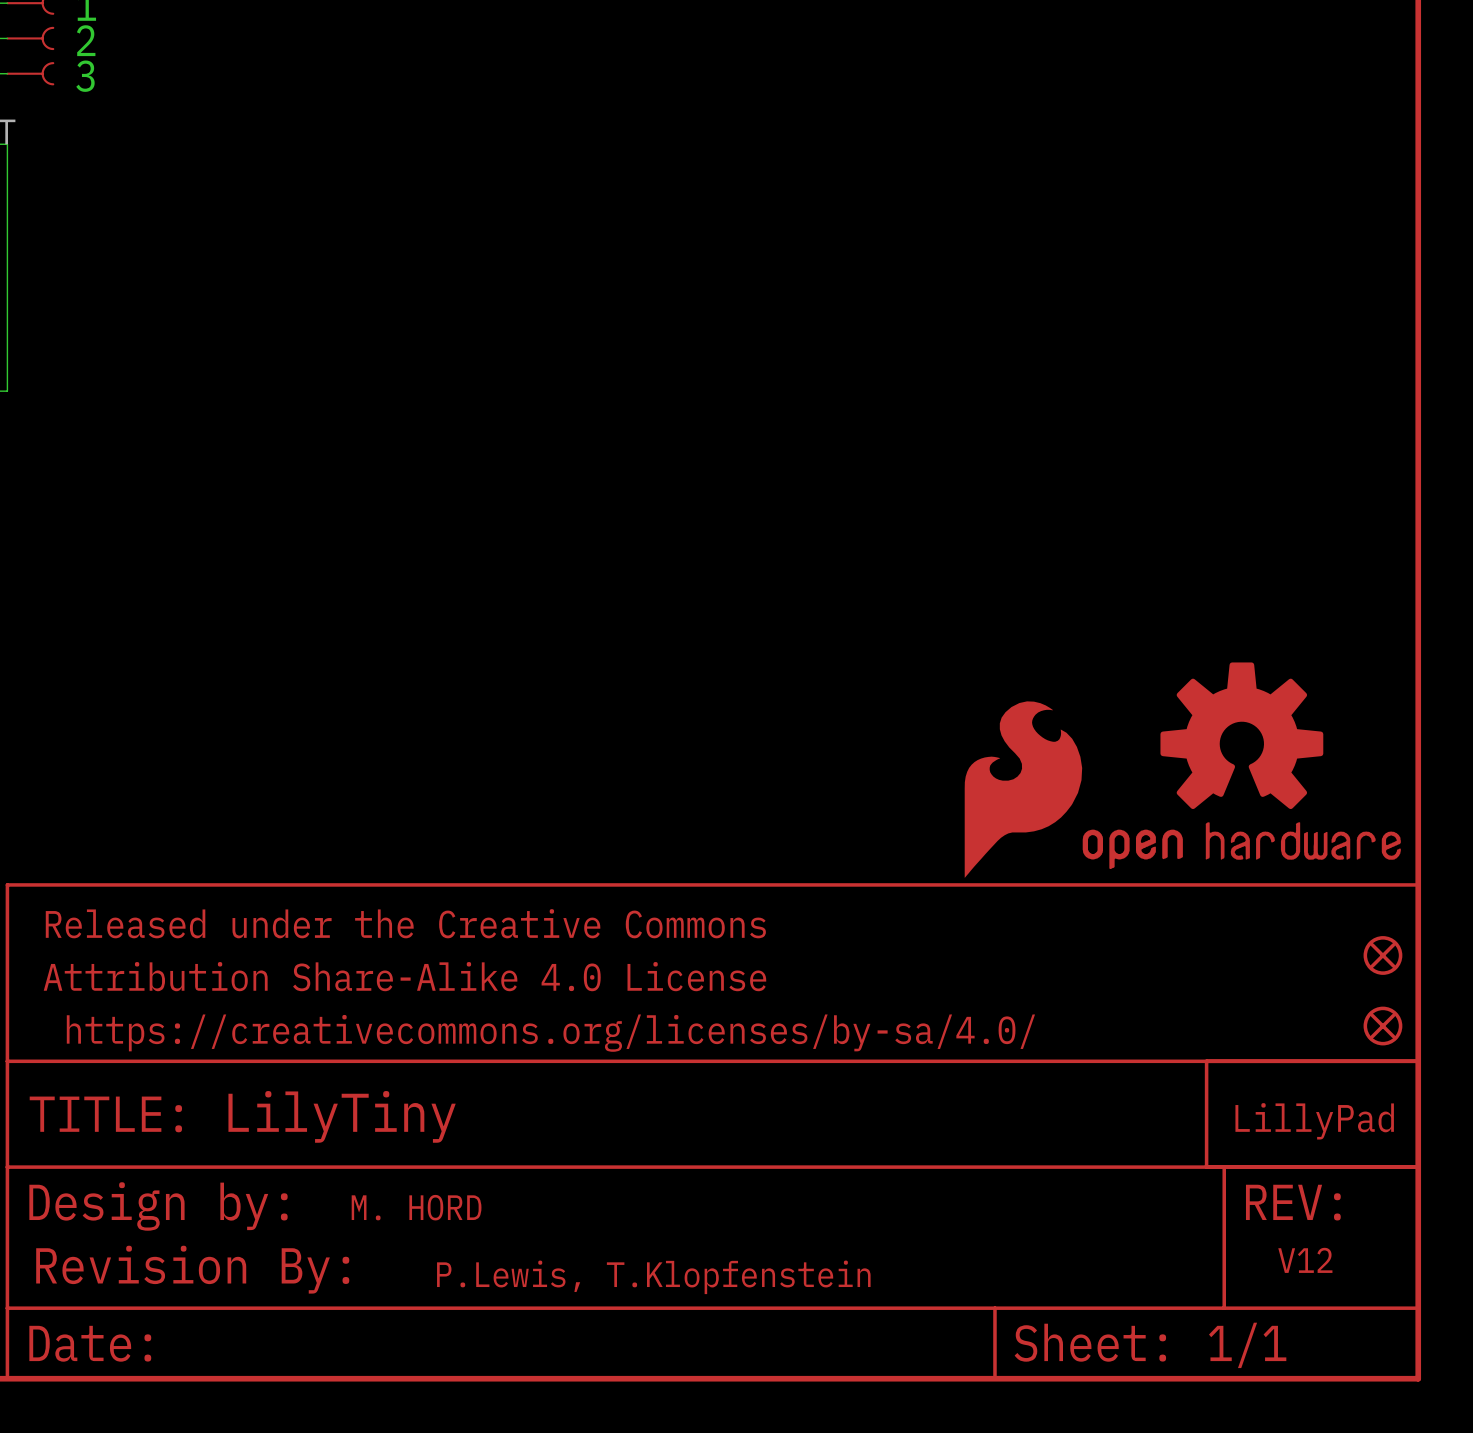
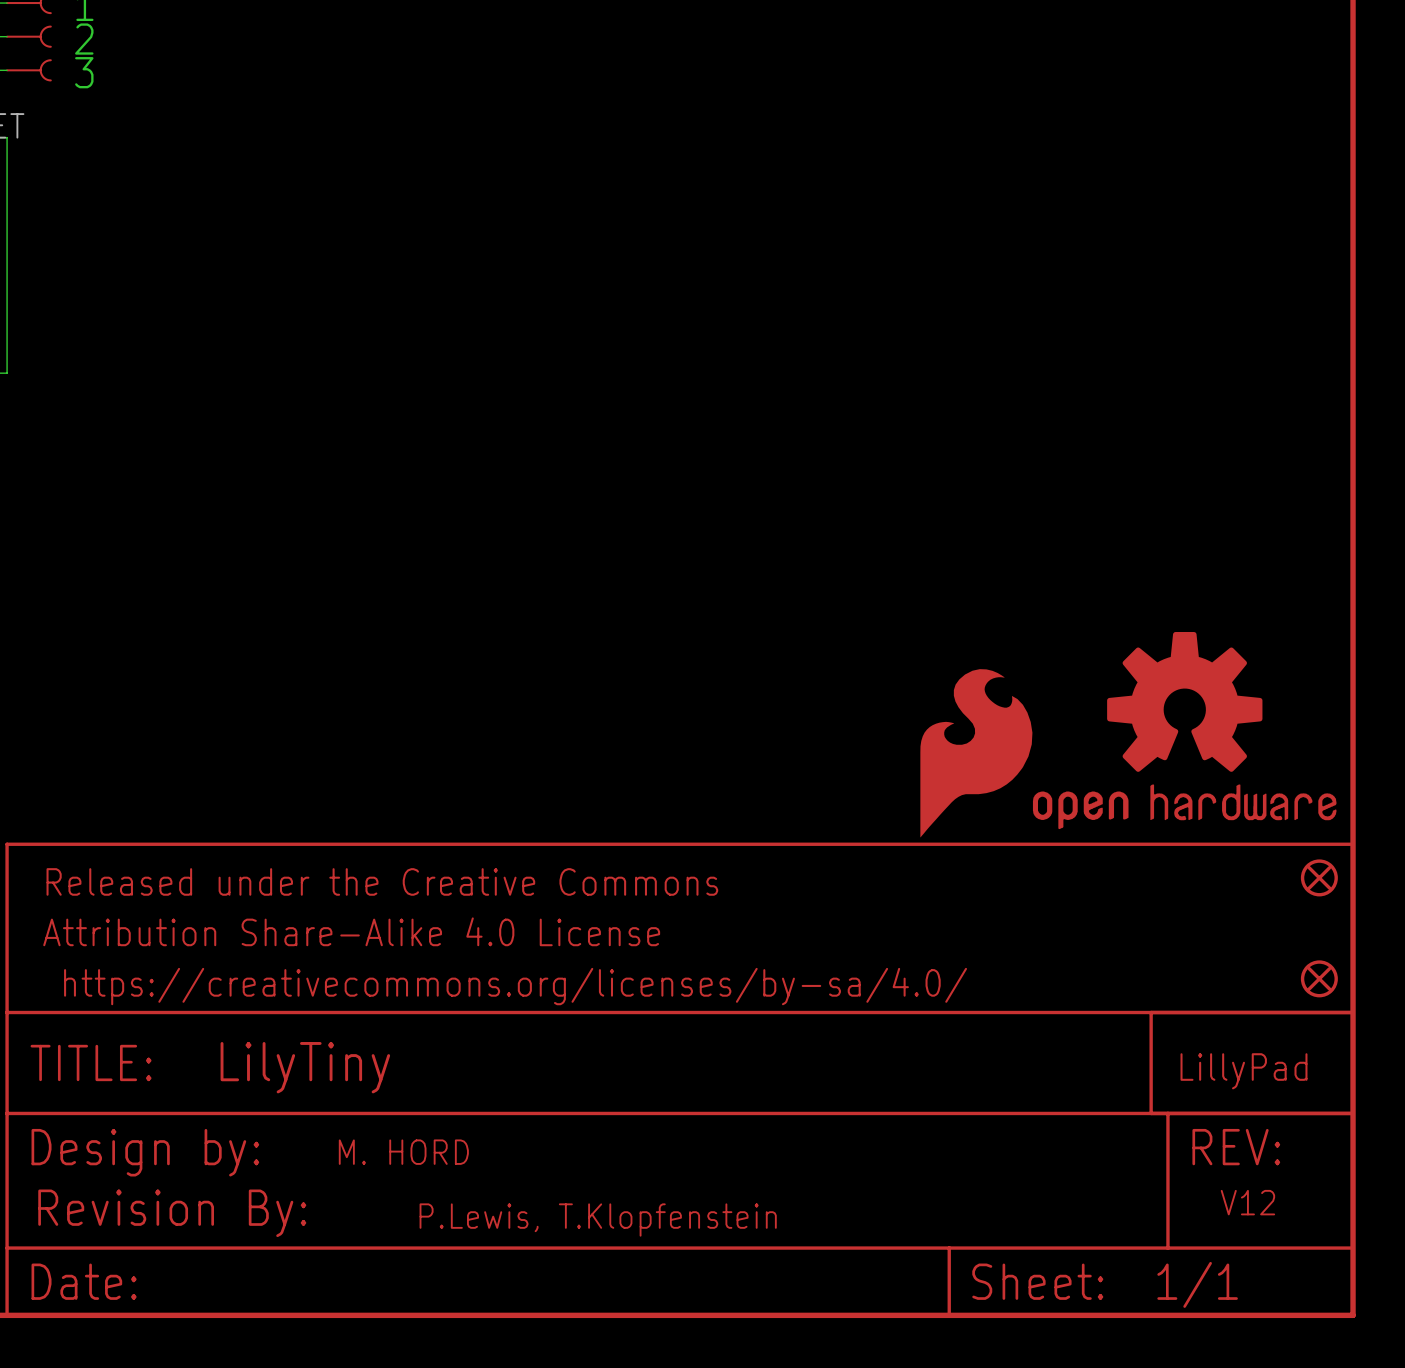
part position: (1382, 955) -> (1319, 877)

